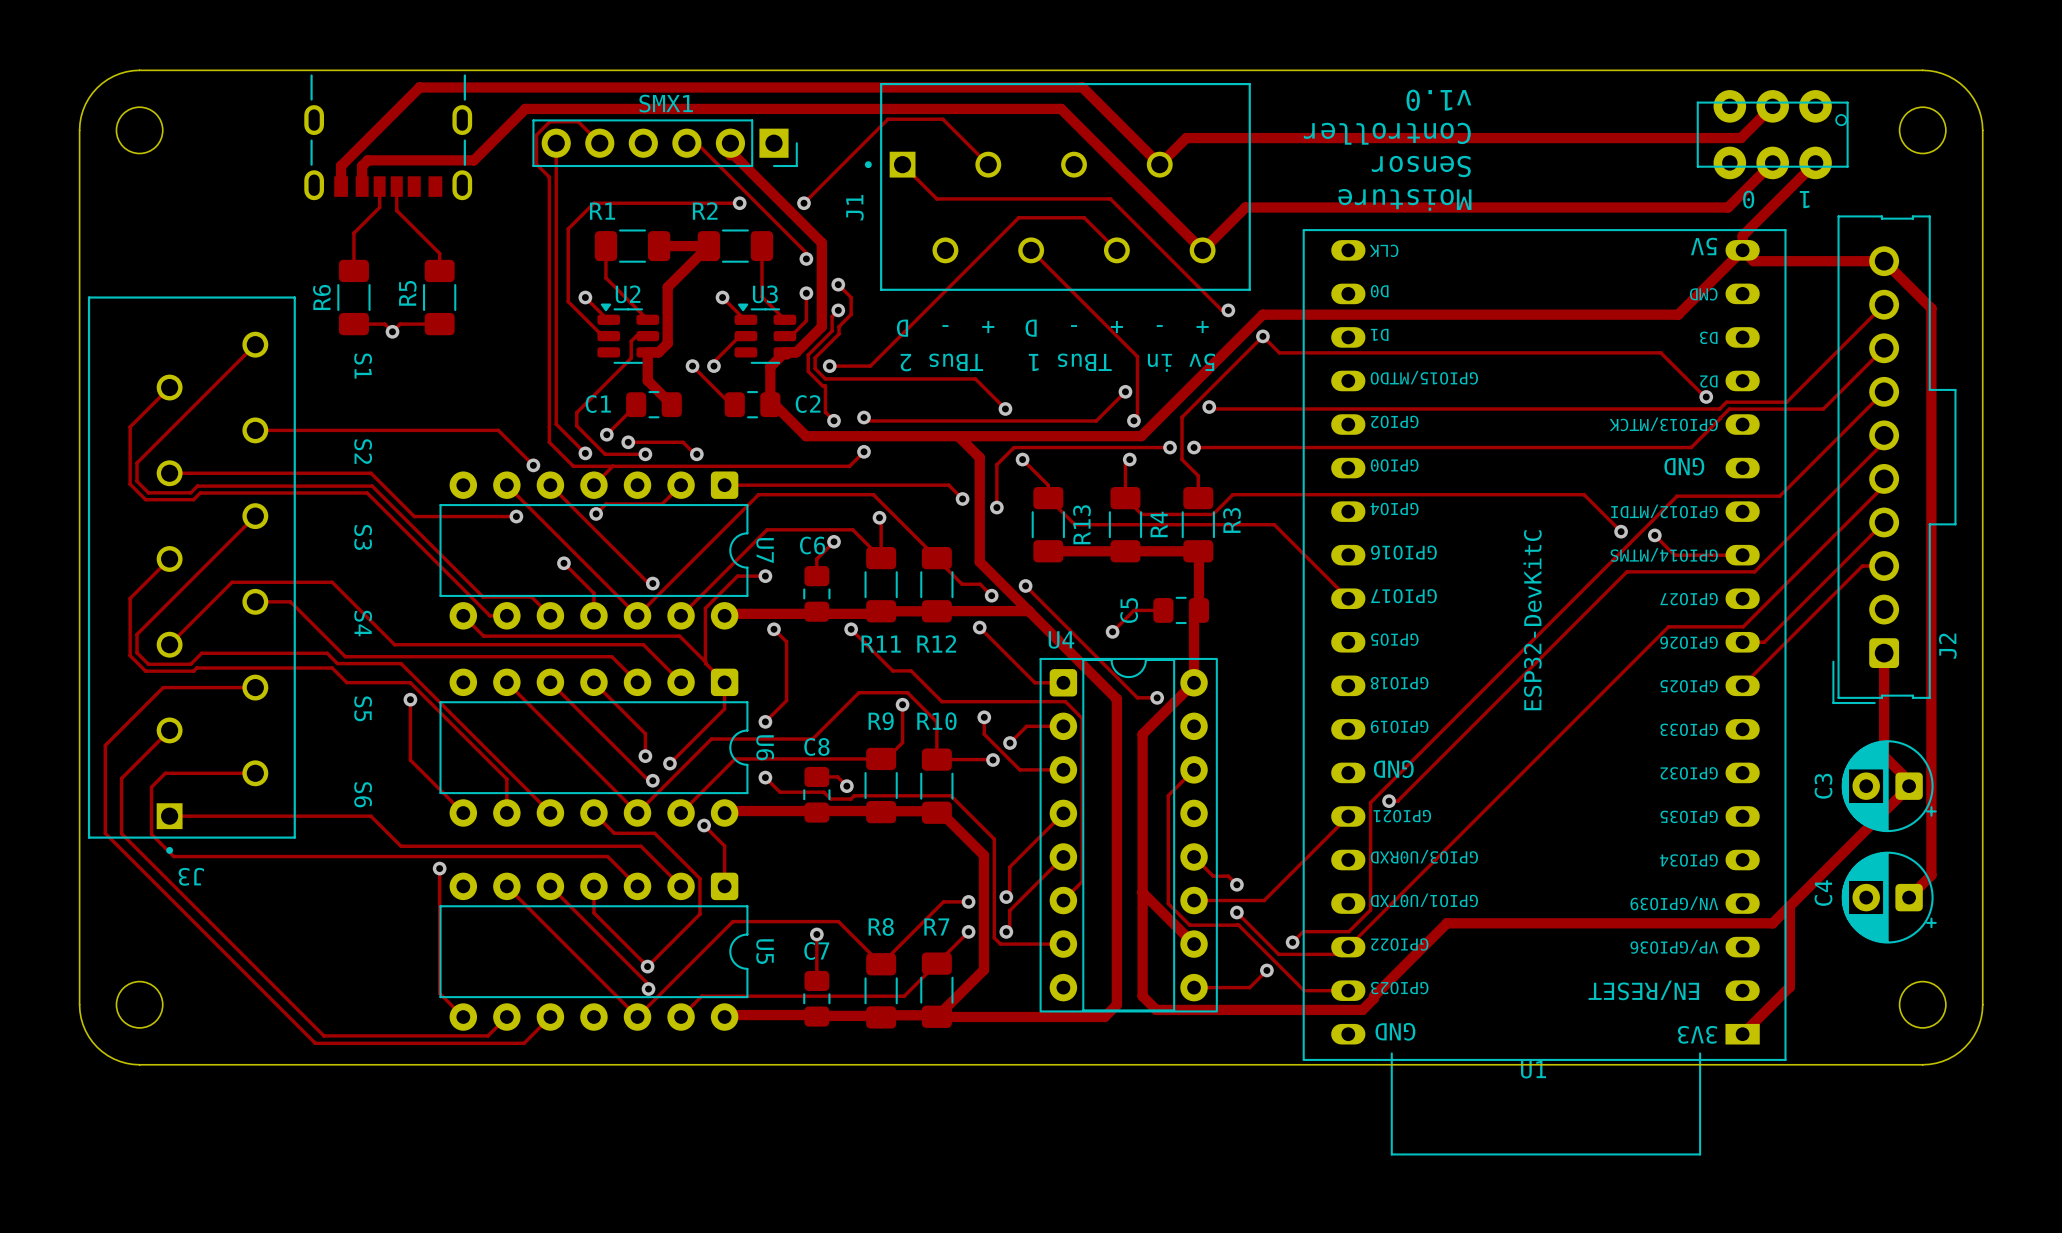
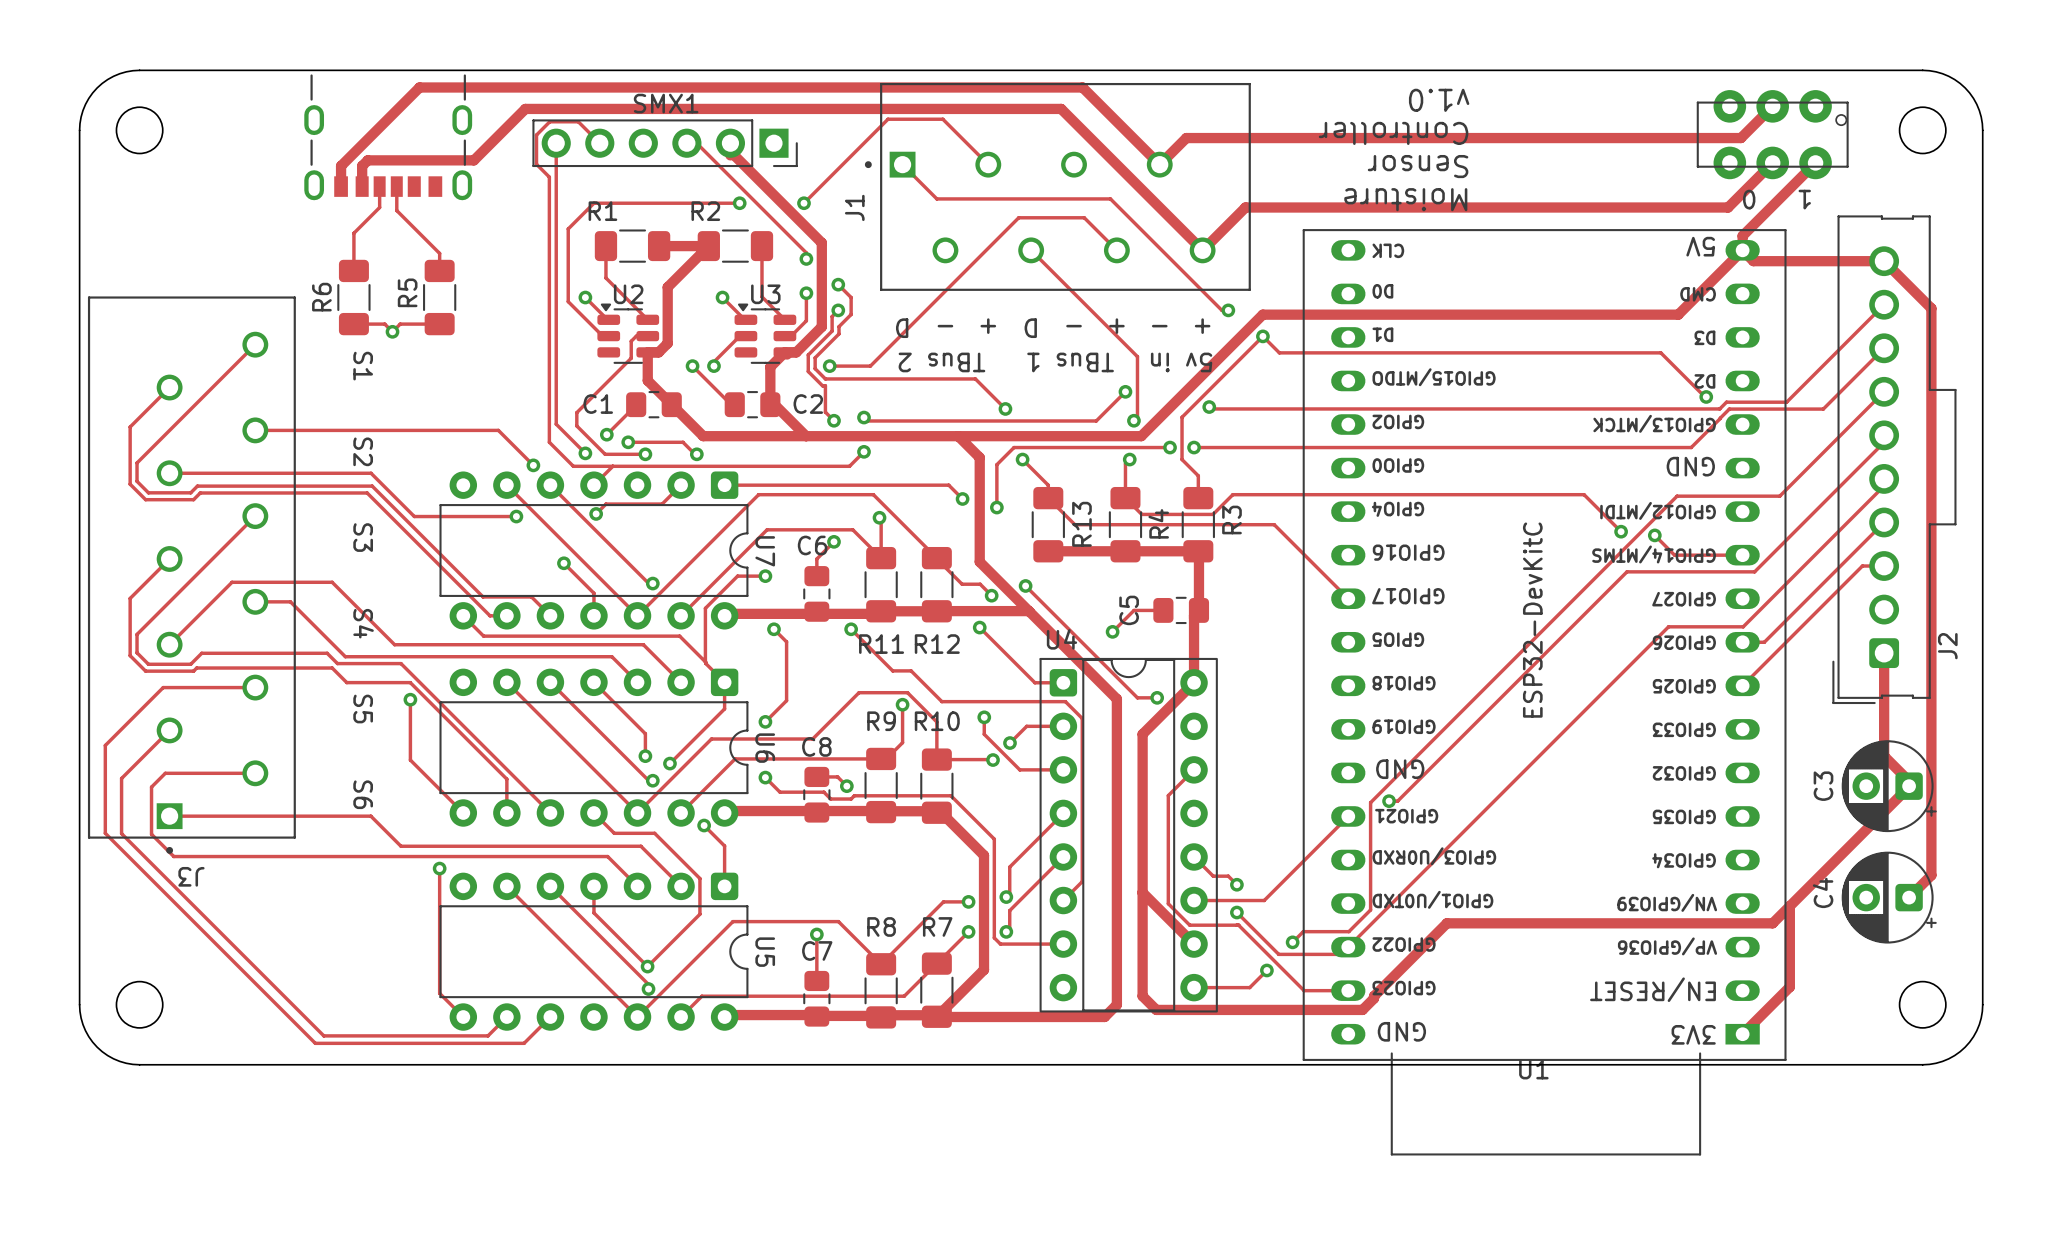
track: none -> (671, 404) (703, 436) (806, 436)

